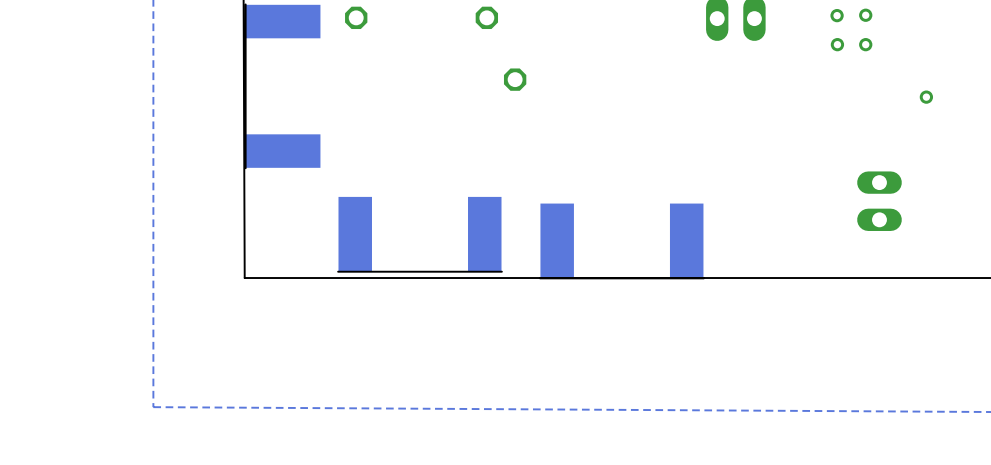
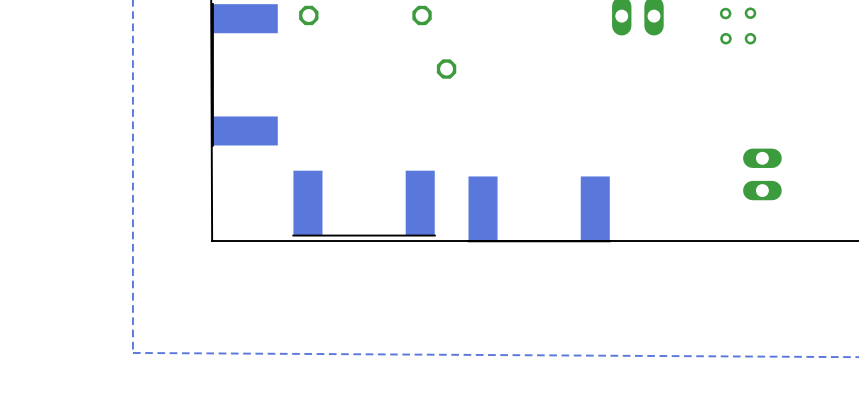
via: (926, 97) -> none

